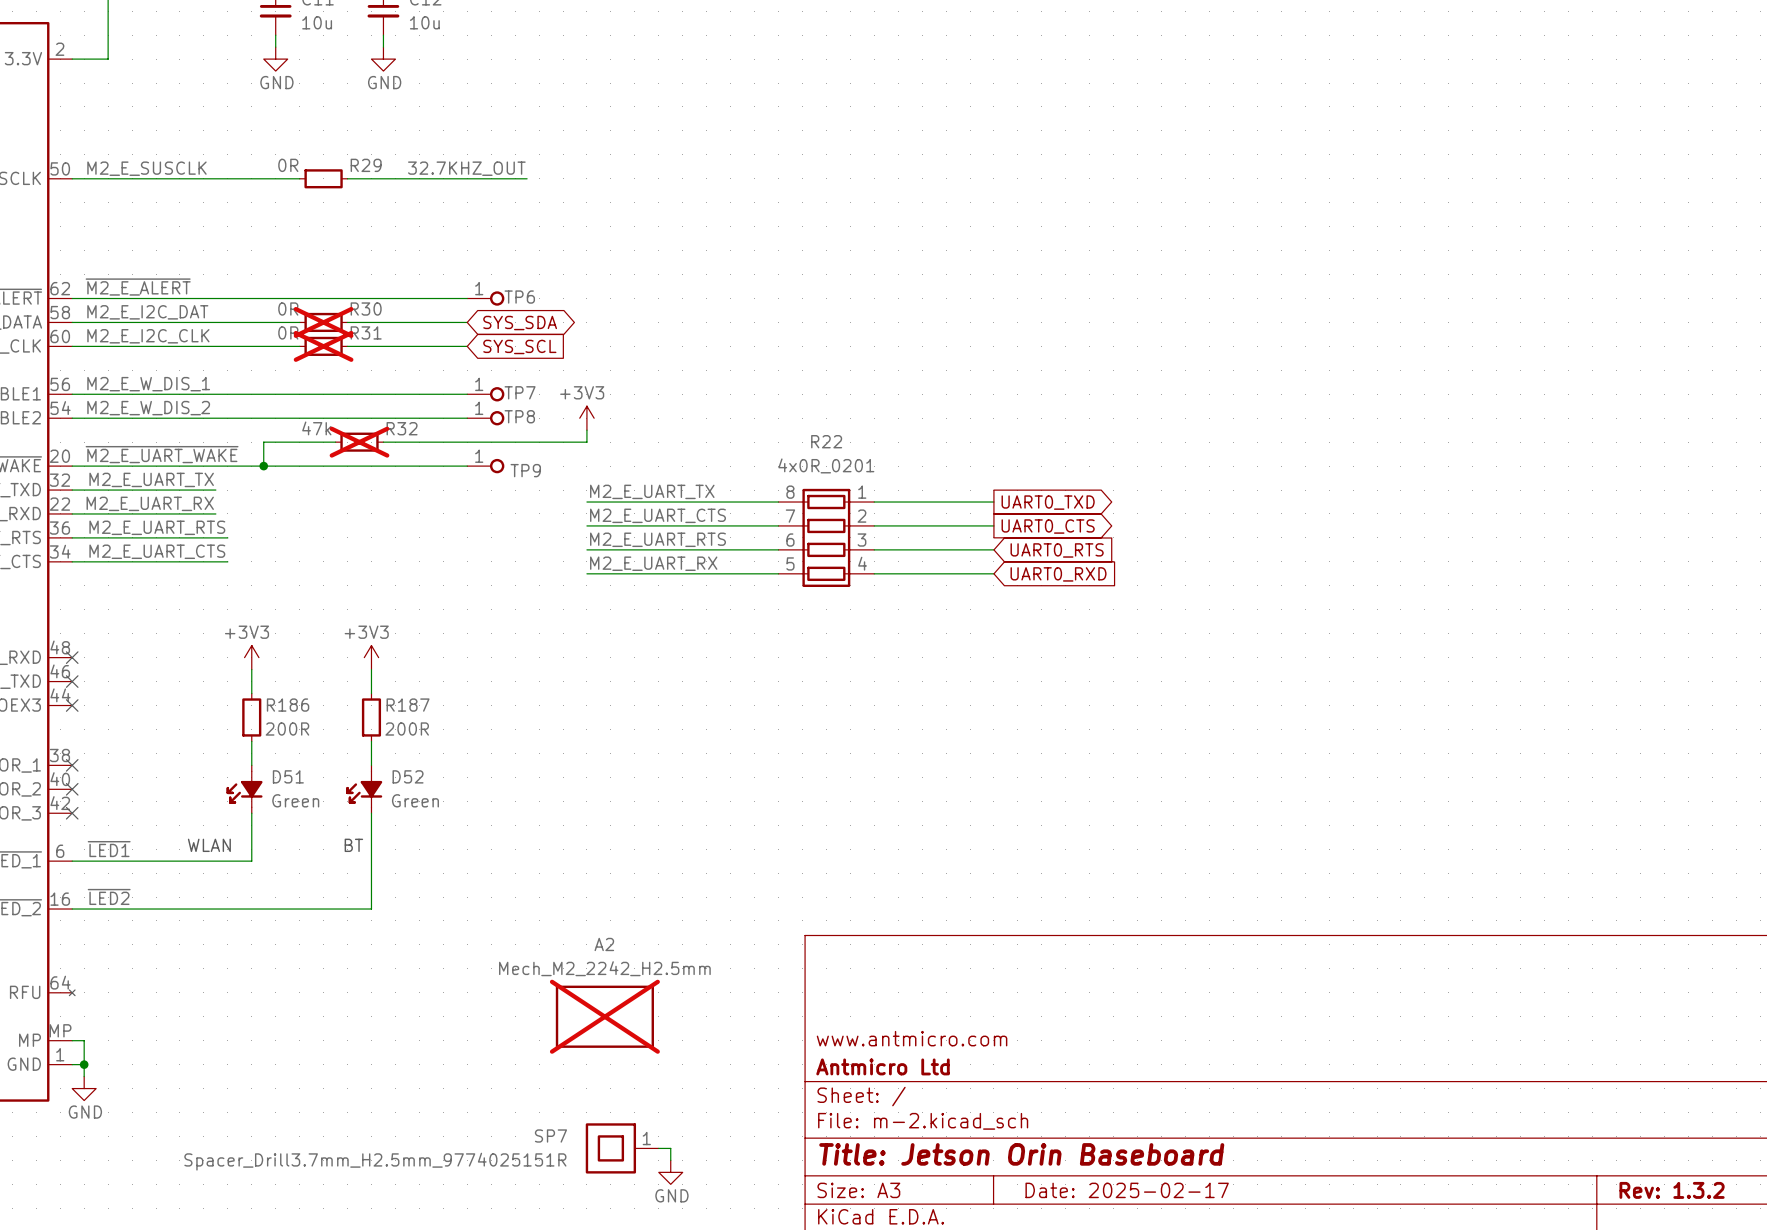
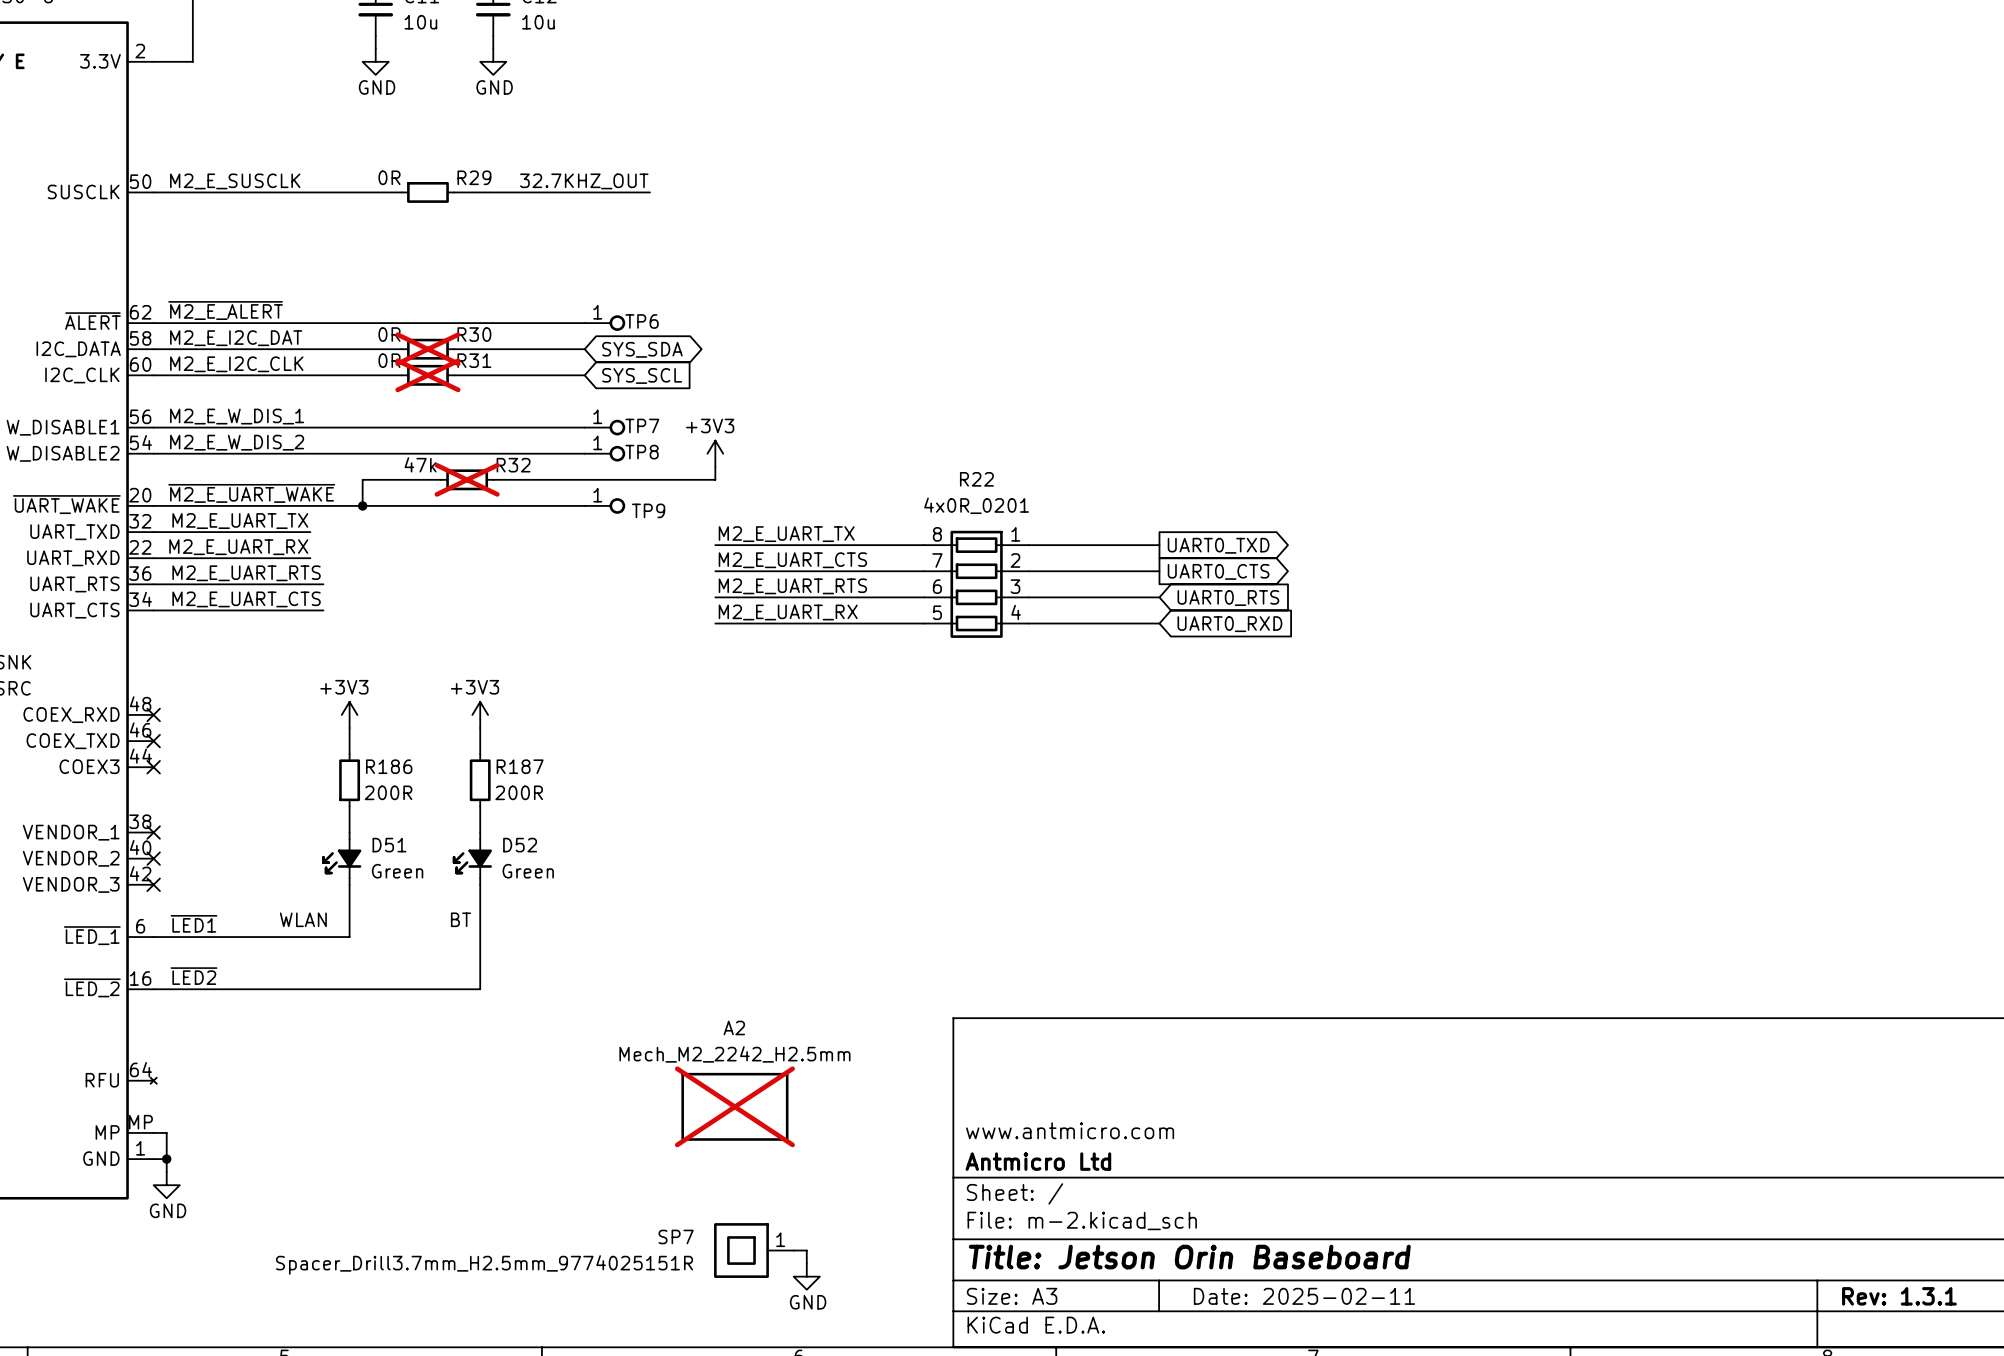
title block: Date: 2025-02-17 (1127, 1190) -> Date: 2025-02-11 (1304, 1296)
title block: Rev: 1.3.2 (1672, 1190) -> Rev: 1.3.1 (1899, 1296)

